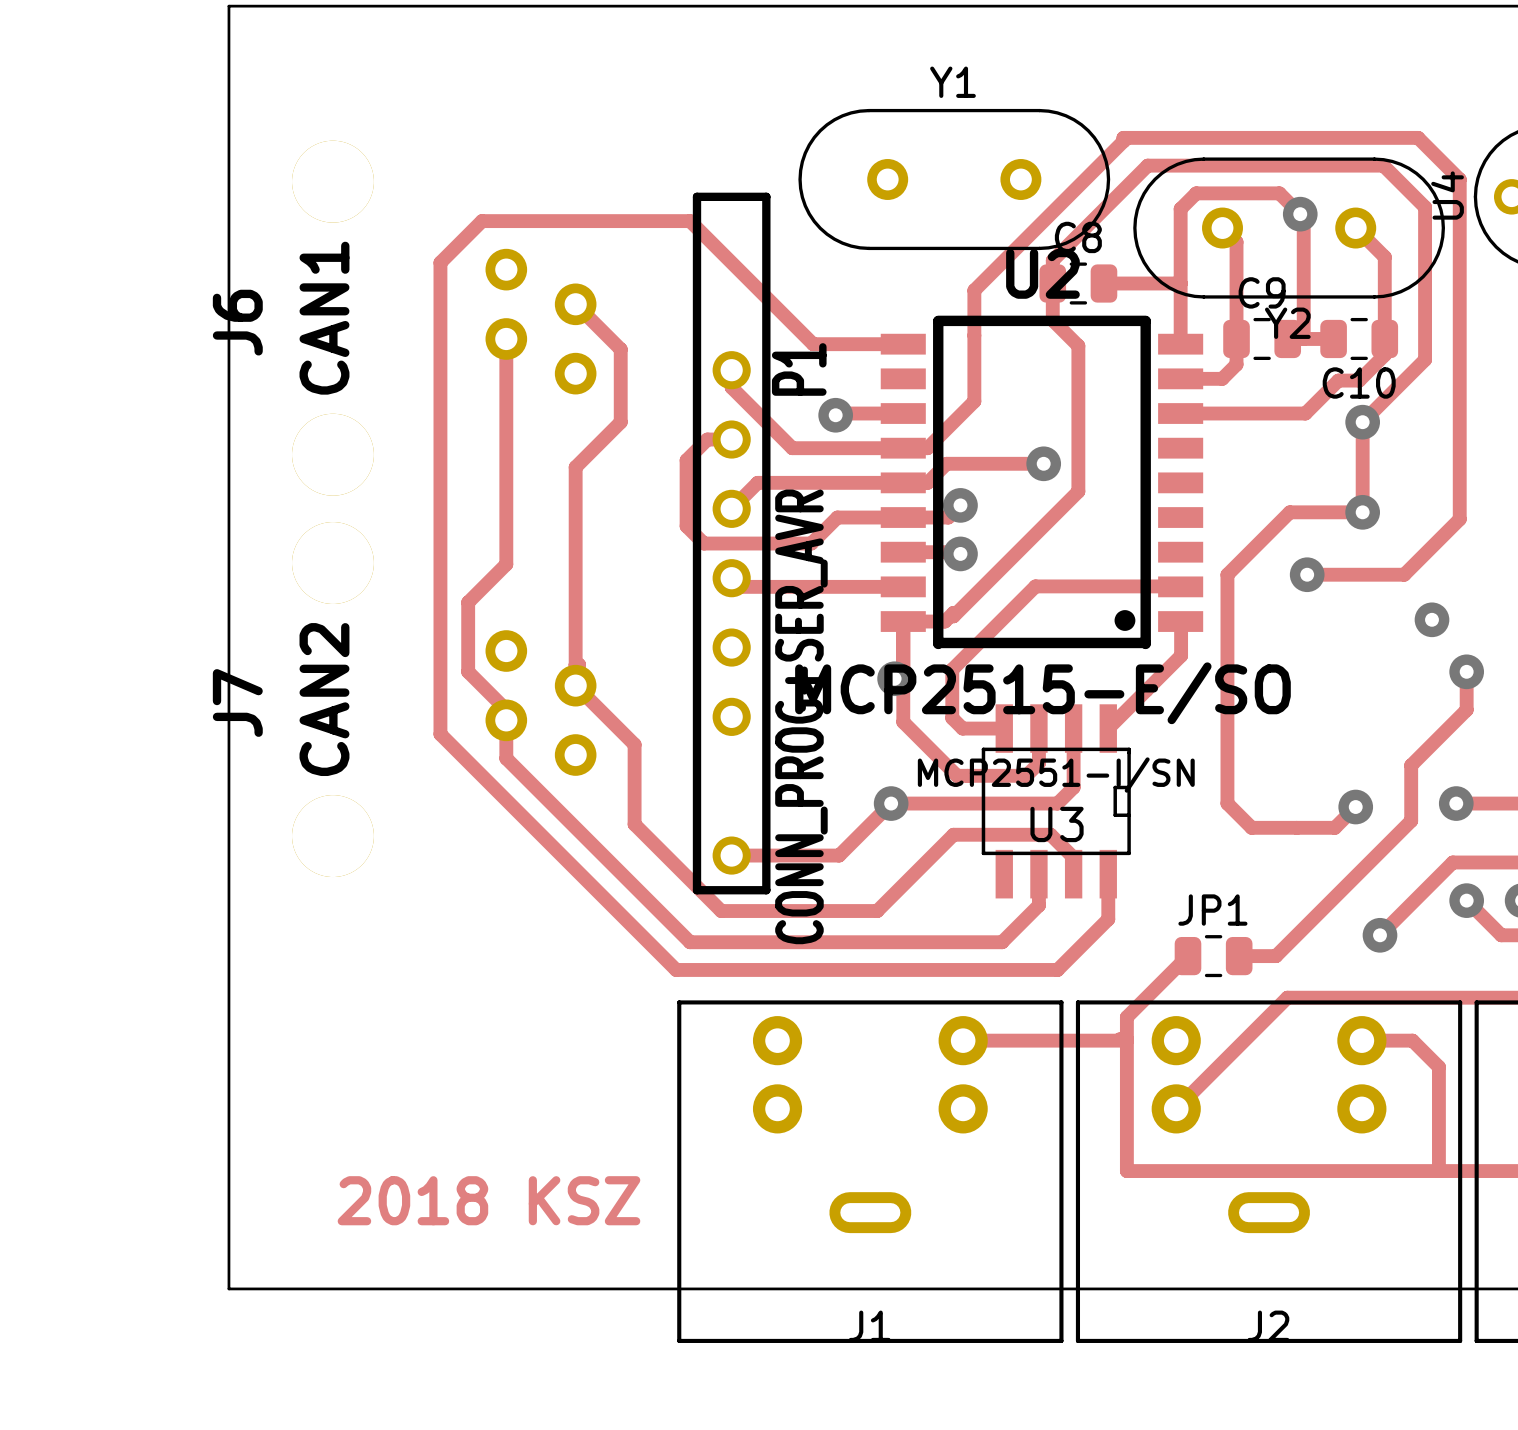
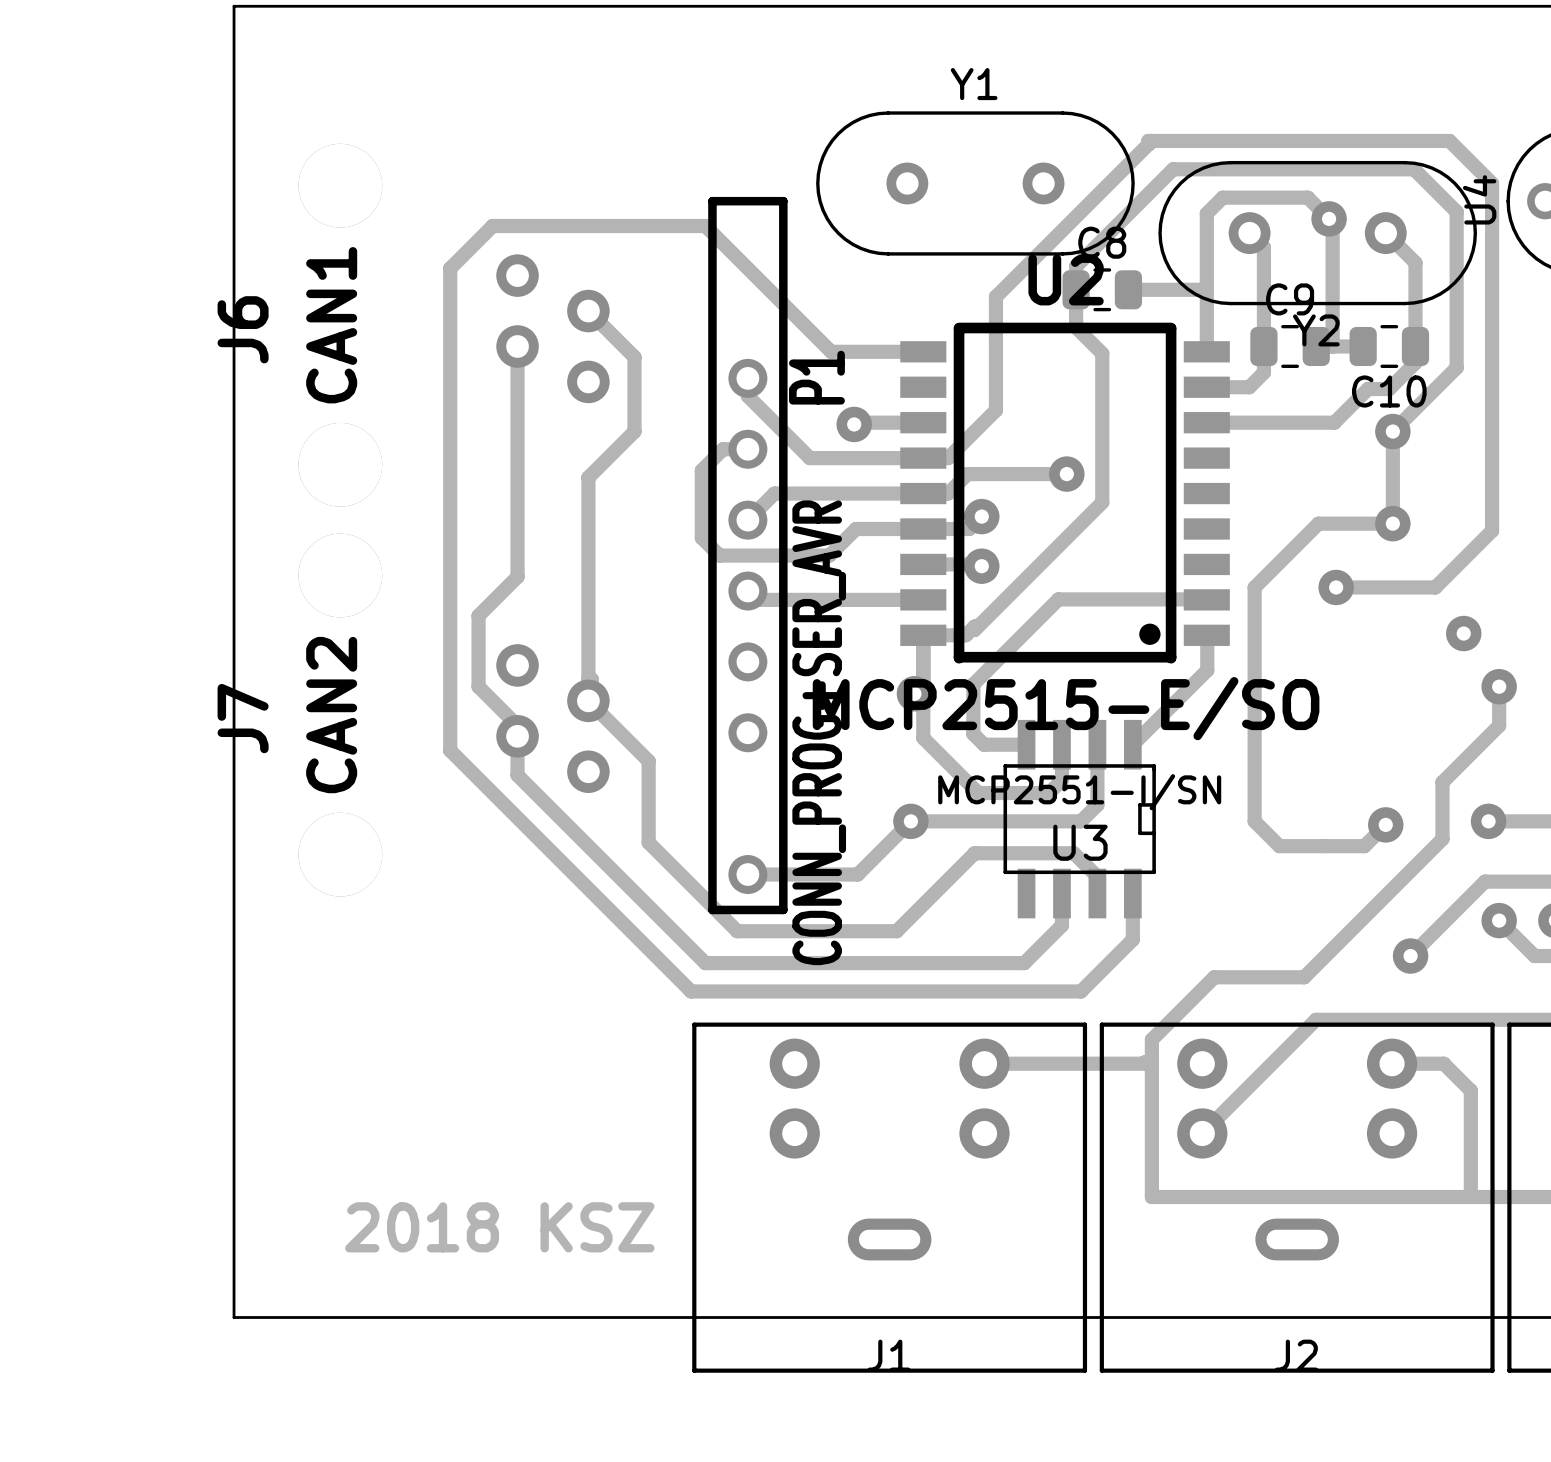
track: none -> (1214, 977) (1266, 977)
JP1: (1213, 956) -> none

